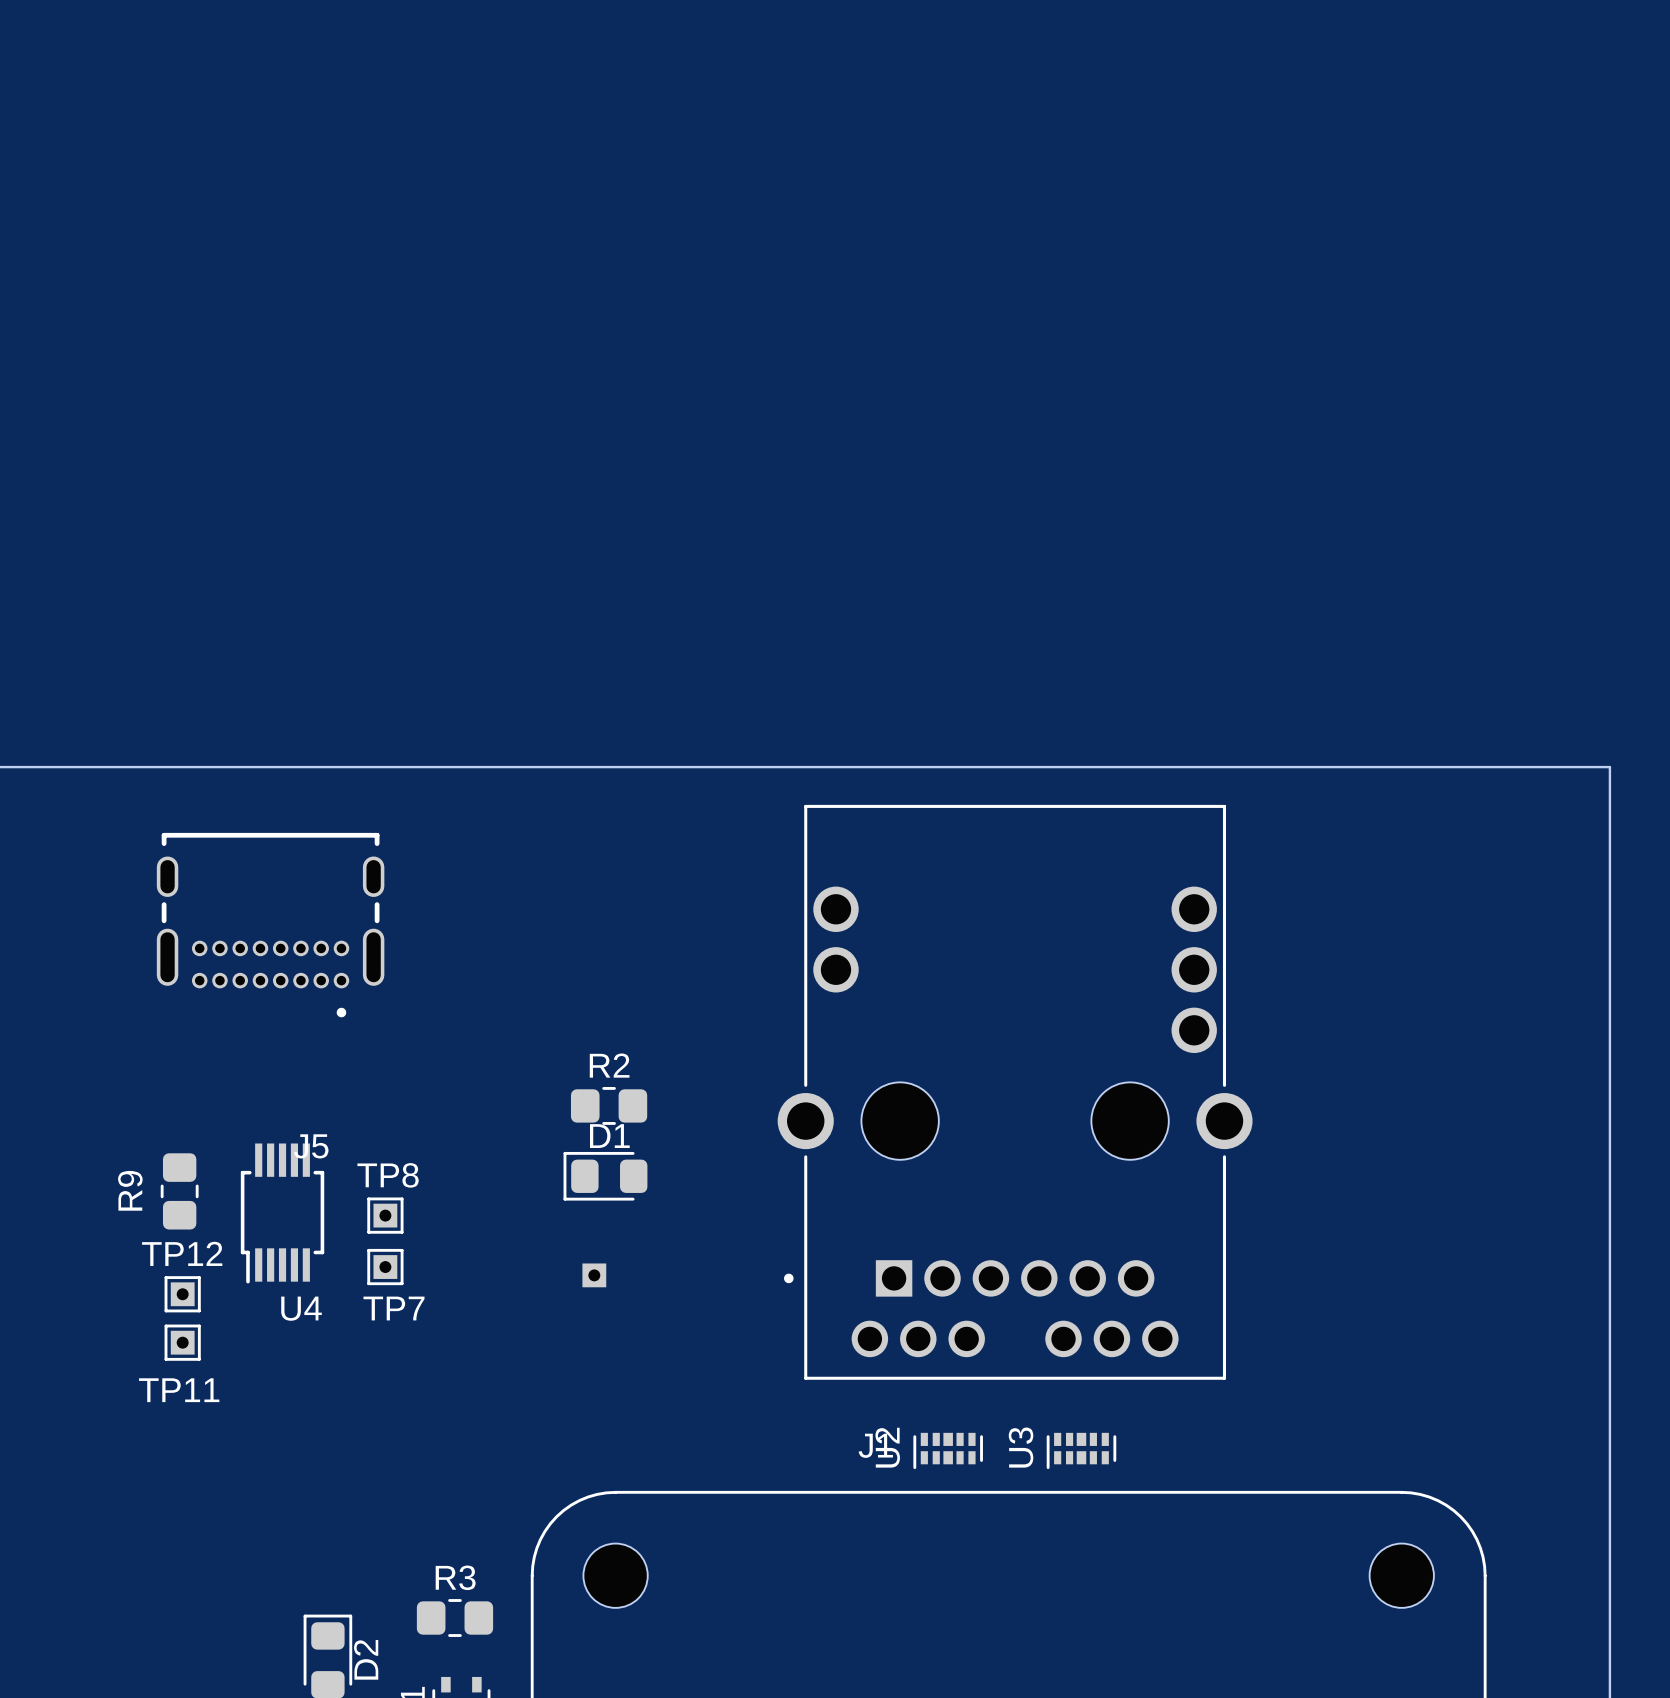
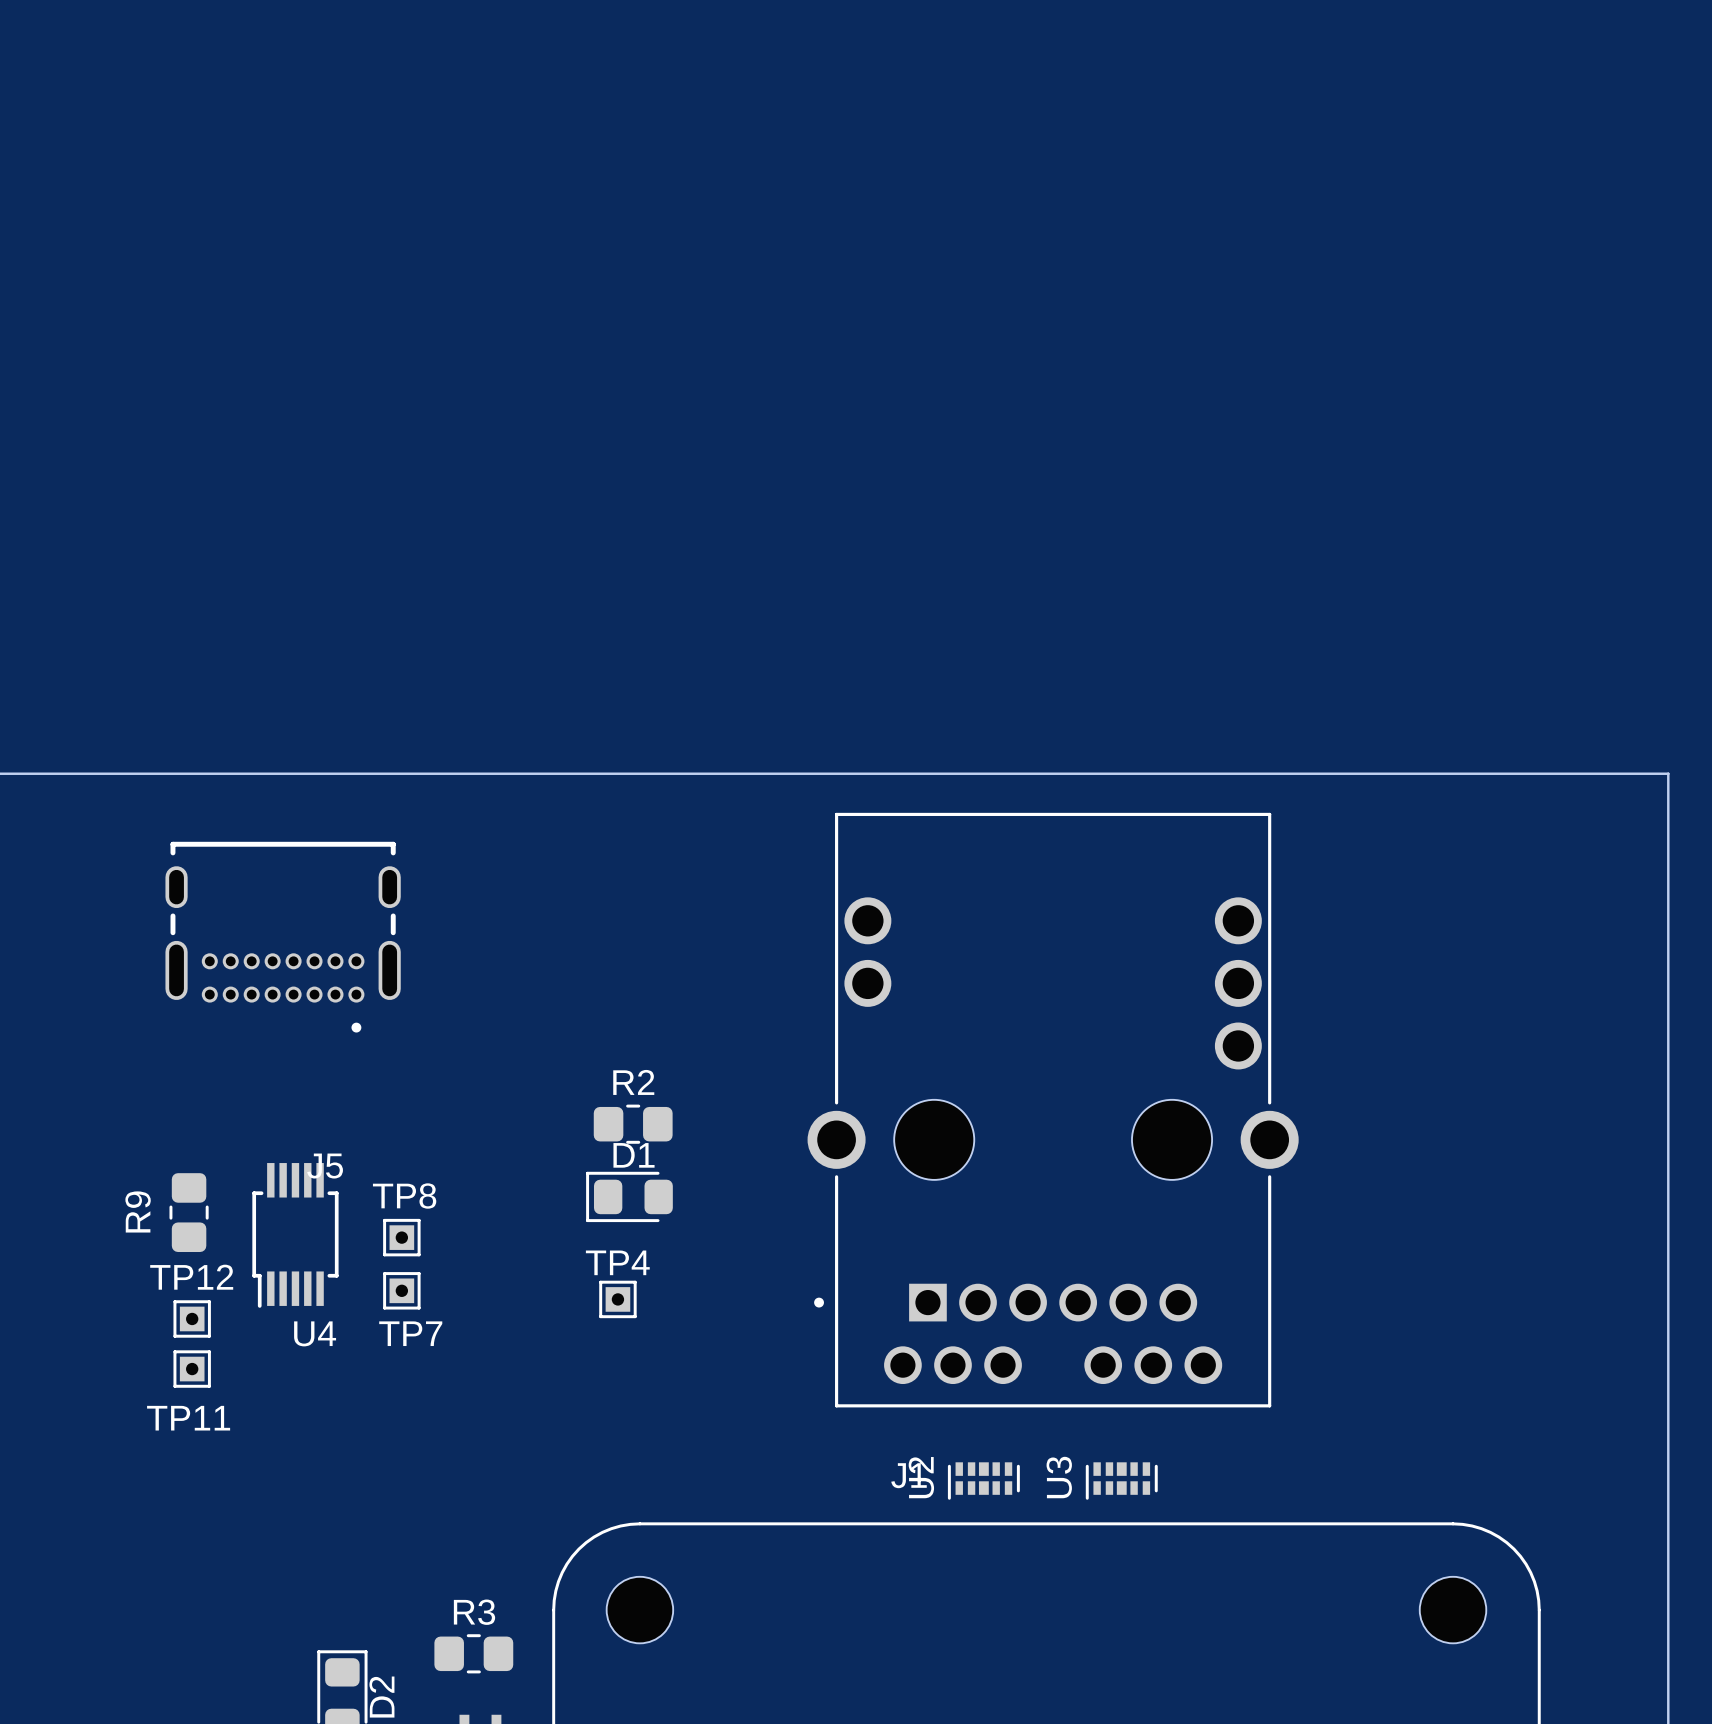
TP4 side: bottom (594, 1275) -> top (617, 1299)

